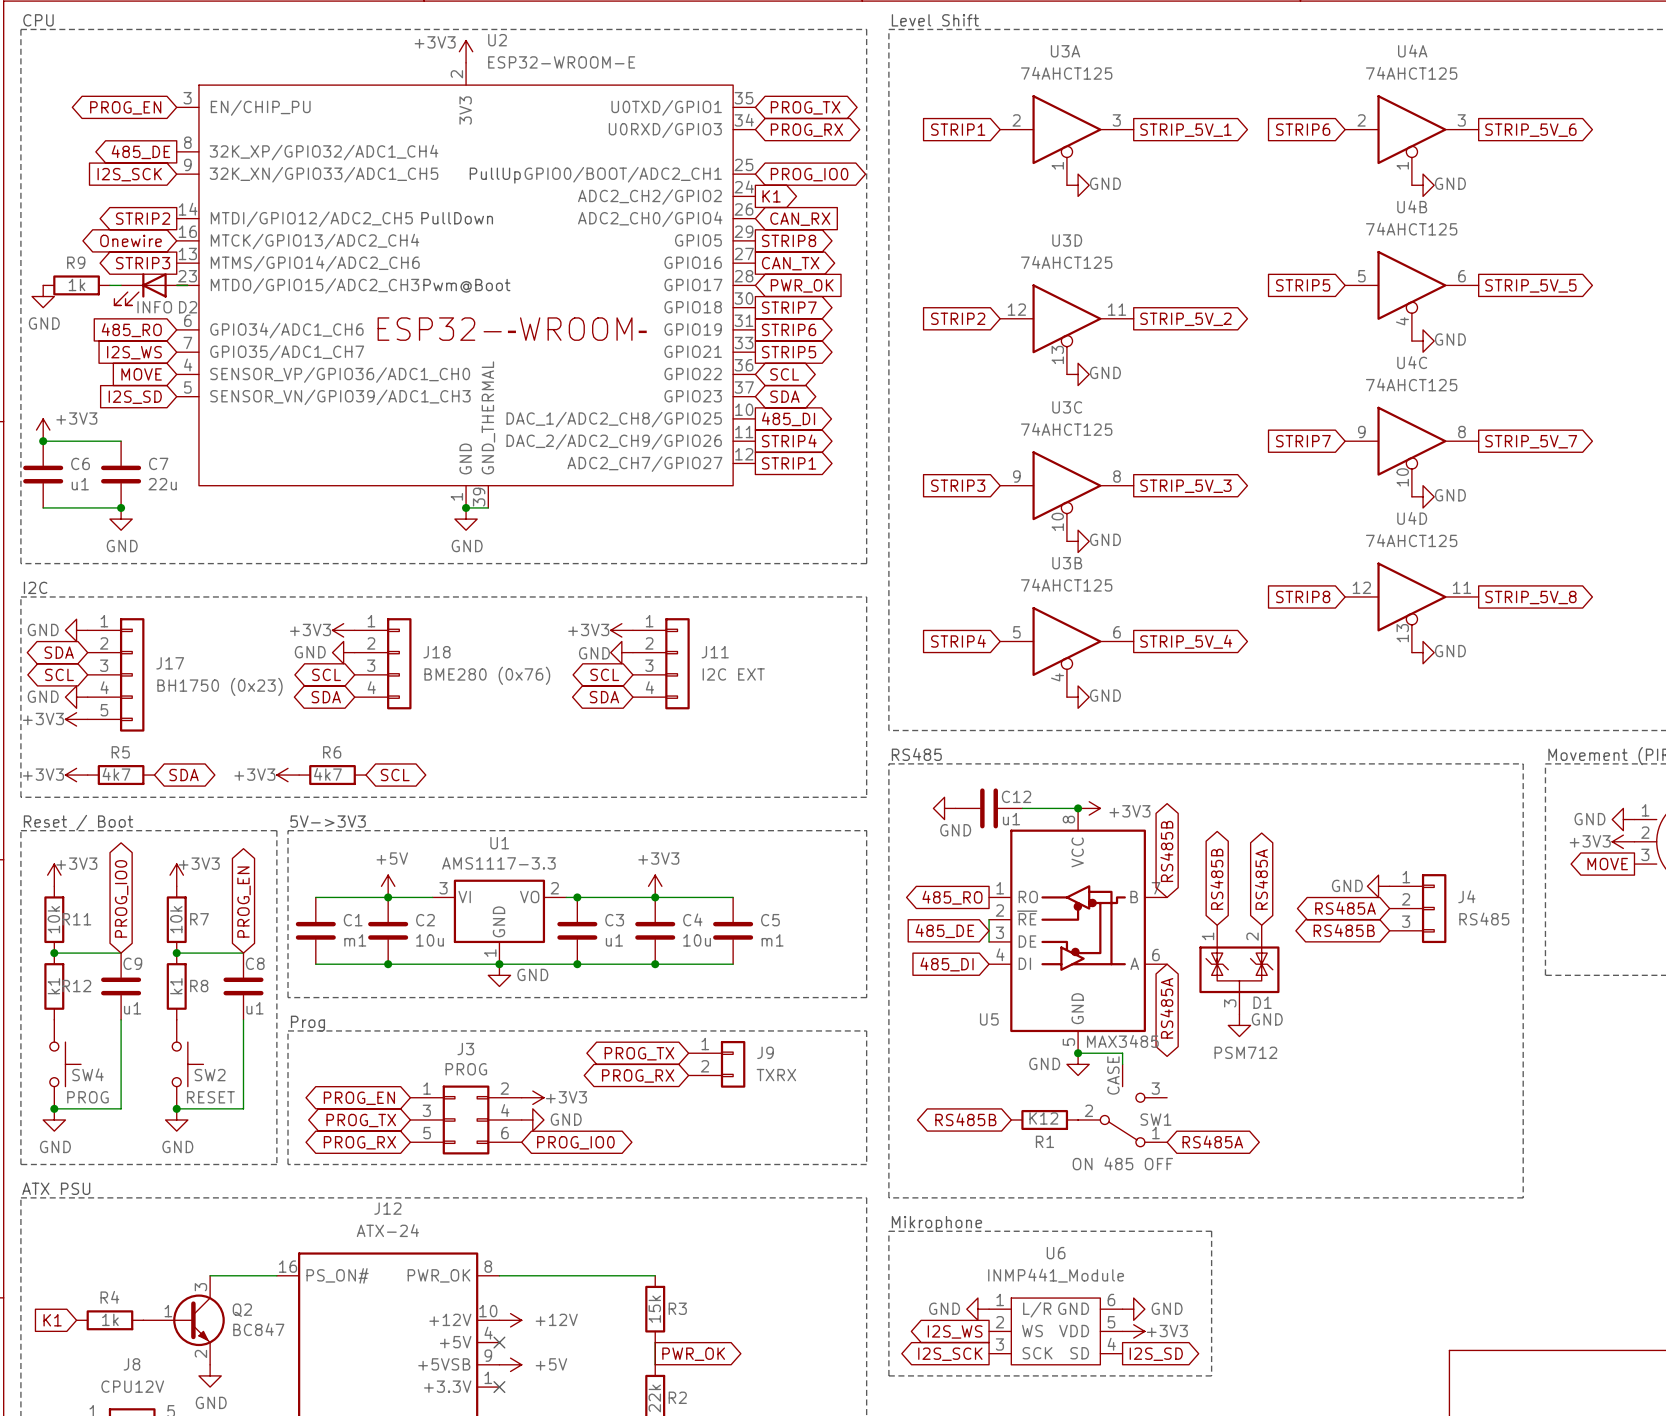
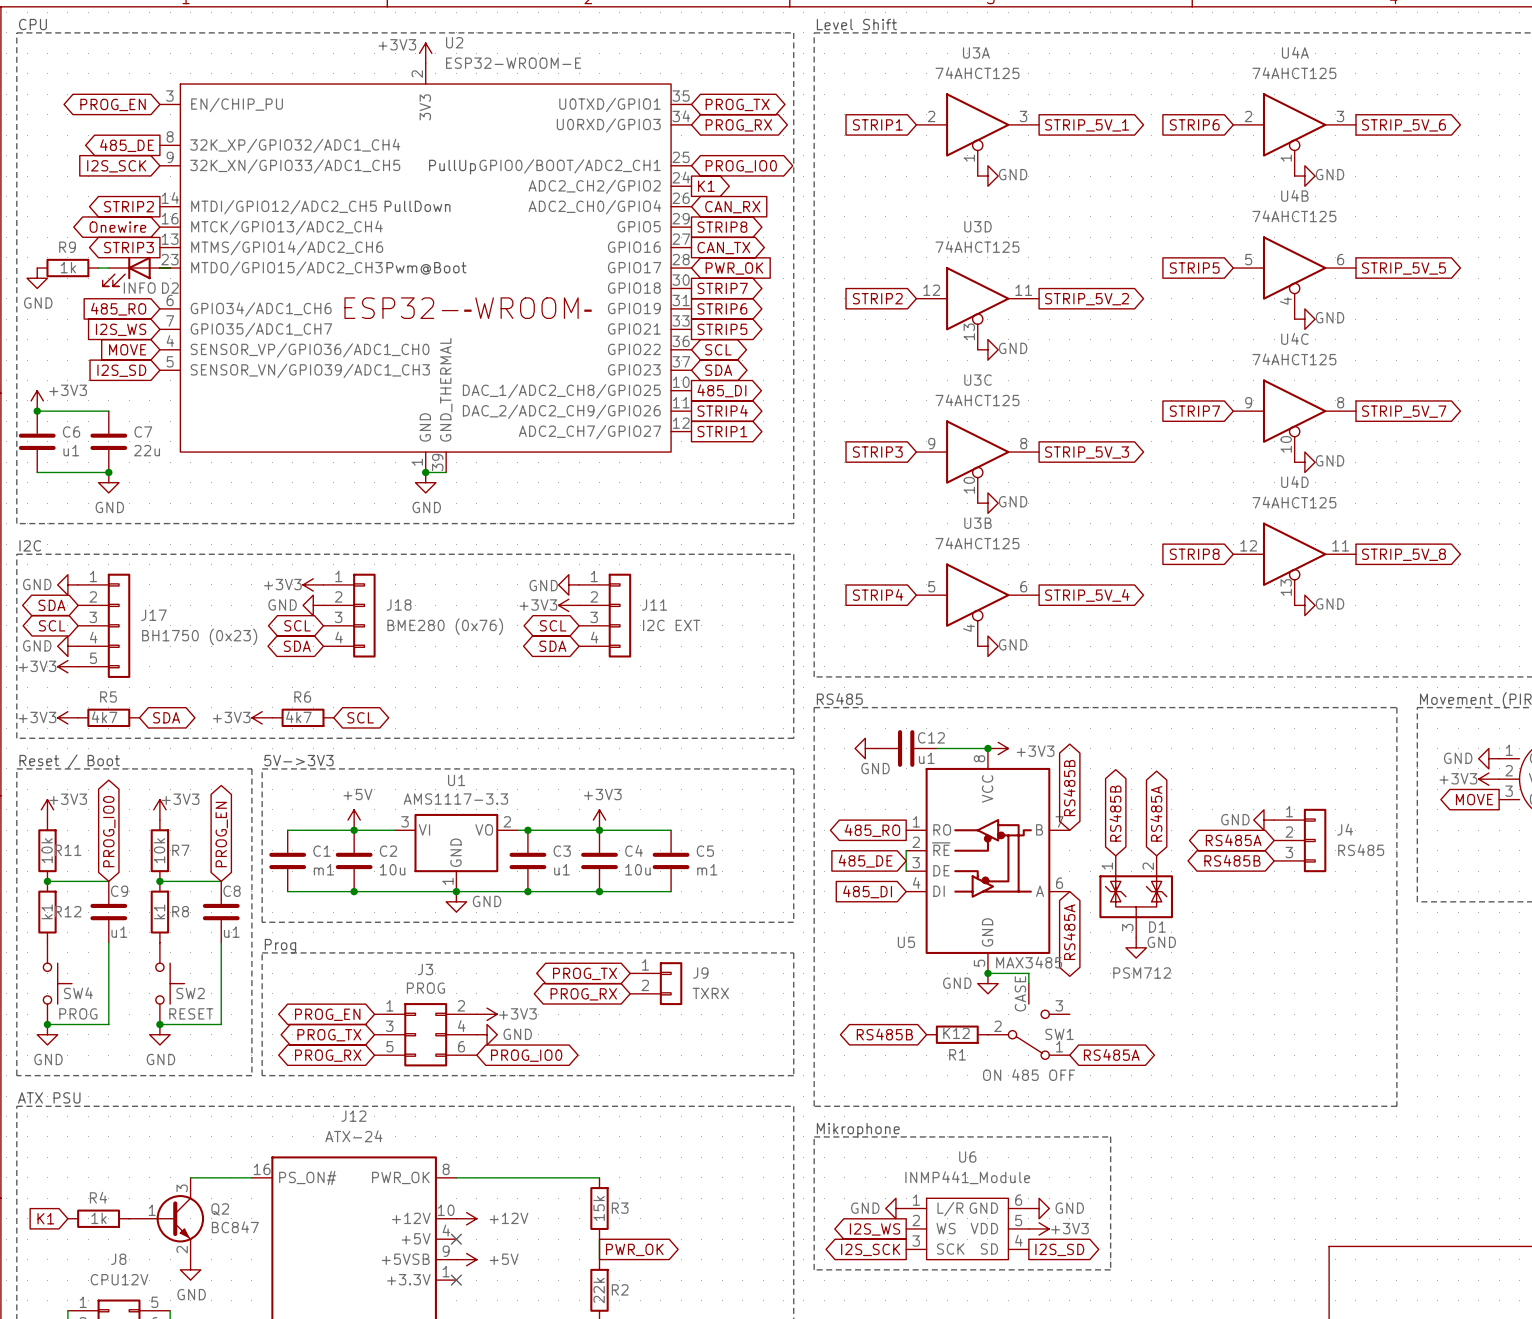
power symbol: +3V3 (621, 630) -> GND (568, 584)
power symbol: GND (621, 652) -> +3V3 (568, 605)

